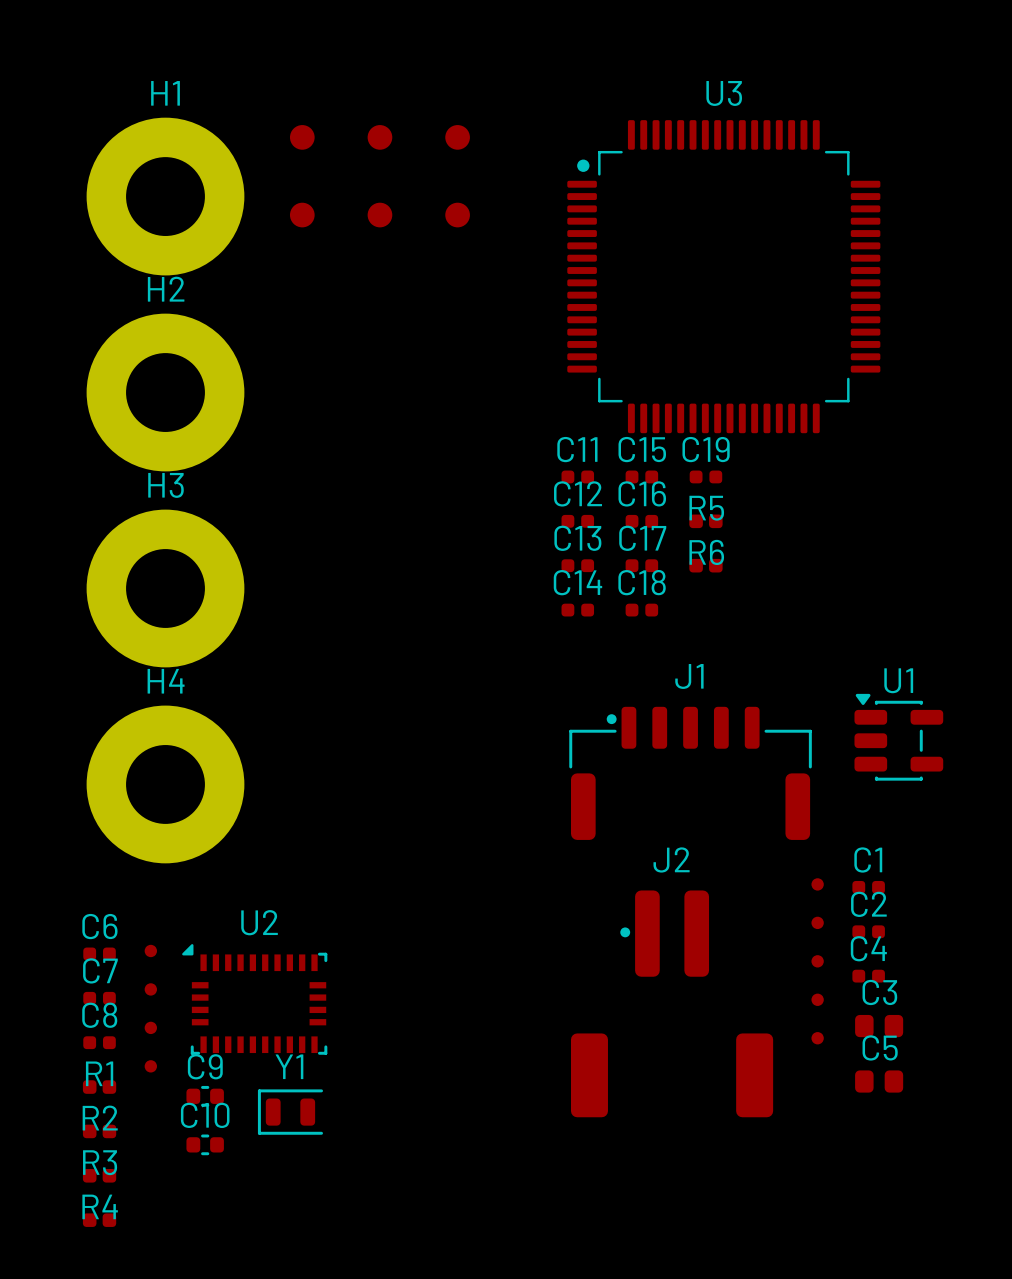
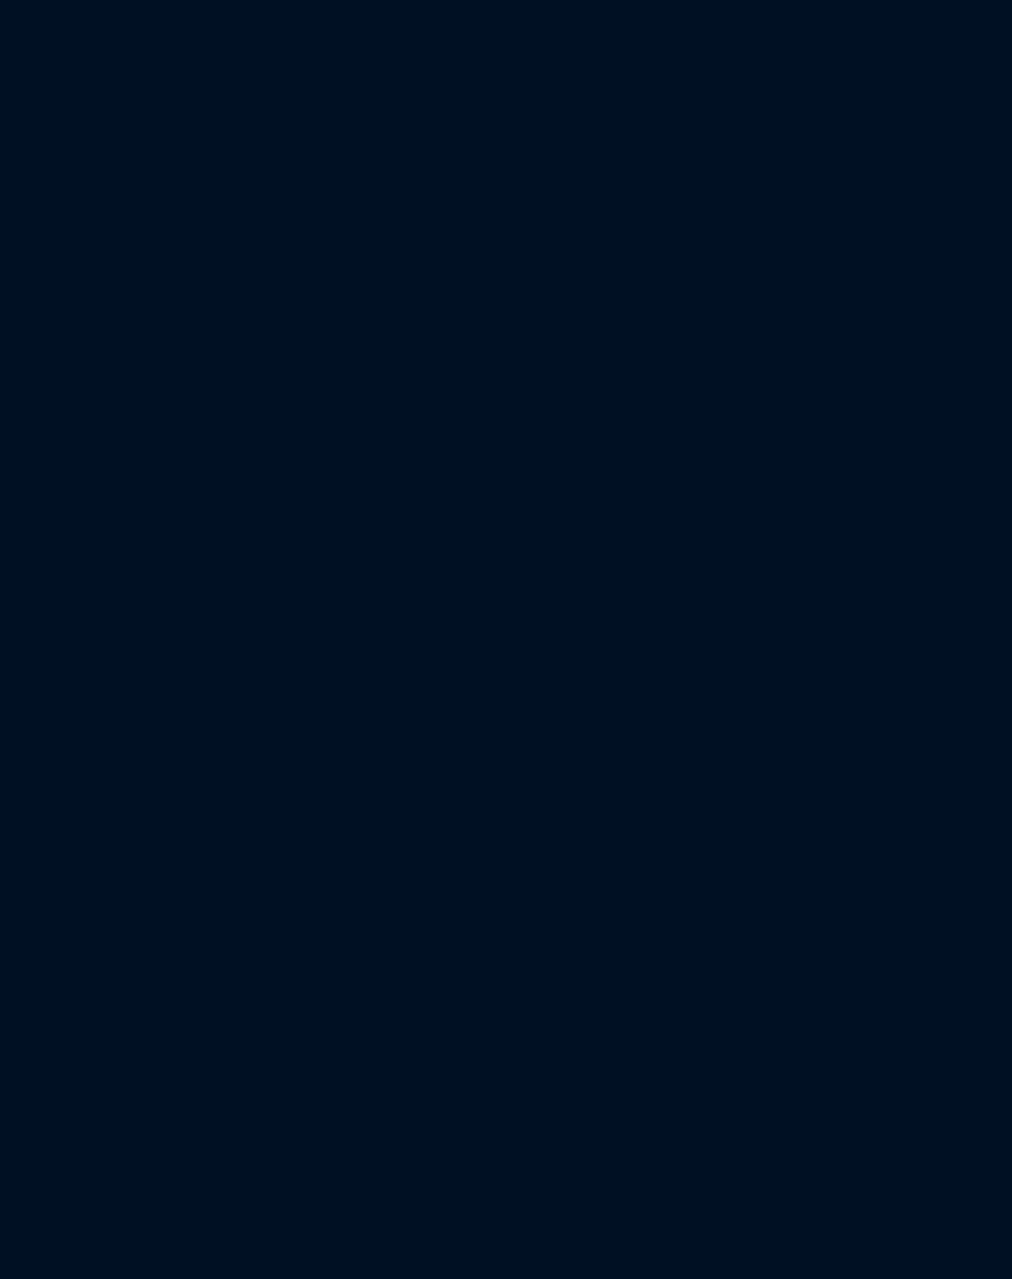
part: (302, 137) -> none
part: (379, 137) -> none
part: (457, 137) -> none
H1: (165, 196) -> none
part: (302, 215) -> none
part: (379, 215) -> none
part: (457, 215) -> none
U3: (723, 276) -> none
H2: (165, 392) -> none
C11: (577, 476) -> none
C15: (641, 476) -> none
C19: (705, 476) -> none
C12: (577, 521) -> none
C16: (641, 521) -> none
R5: (705, 521) -> none
C13: (577, 565) -> none
C17: (641, 565) -> none
R6: (705, 565) -> none
H3: (165, 588) -> none
C14: (577, 610) -> none
C18: (641, 610) -> none
U1: (898, 737) -> none
J1: (690, 773) -> none
H4: (165, 784) -> none
part: (817, 884) -> none
C1: (868, 887) -> none
part: (817, 922) -> none
C2: (868, 931) -> none
part: (150, 950) -> none
C6: (99, 953) -> none
part: (817, 961) -> none
C4: (868, 976) -> none
part: (150, 989) -> none
C7: (99, 998) -> none
U2: (254, 999) -> none
part: (817, 999) -> none
J2: (672, 1003) -> none
C3: (879, 1026) -> none
part: (150, 1027) -> none
part: (817, 1038) -> none
C8: (99, 1042) -> none
part: (150, 1066) -> none
C5: (879, 1081) -> none
R1: (99, 1087) -> none
C9: (205, 1096) -> none
Y1: (290, 1112) -> none
R2: (99, 1131) -> none
C10: (205, 1144) -> none
R3: (99, 1175) -> none
R4: (99, 1220) -> none

